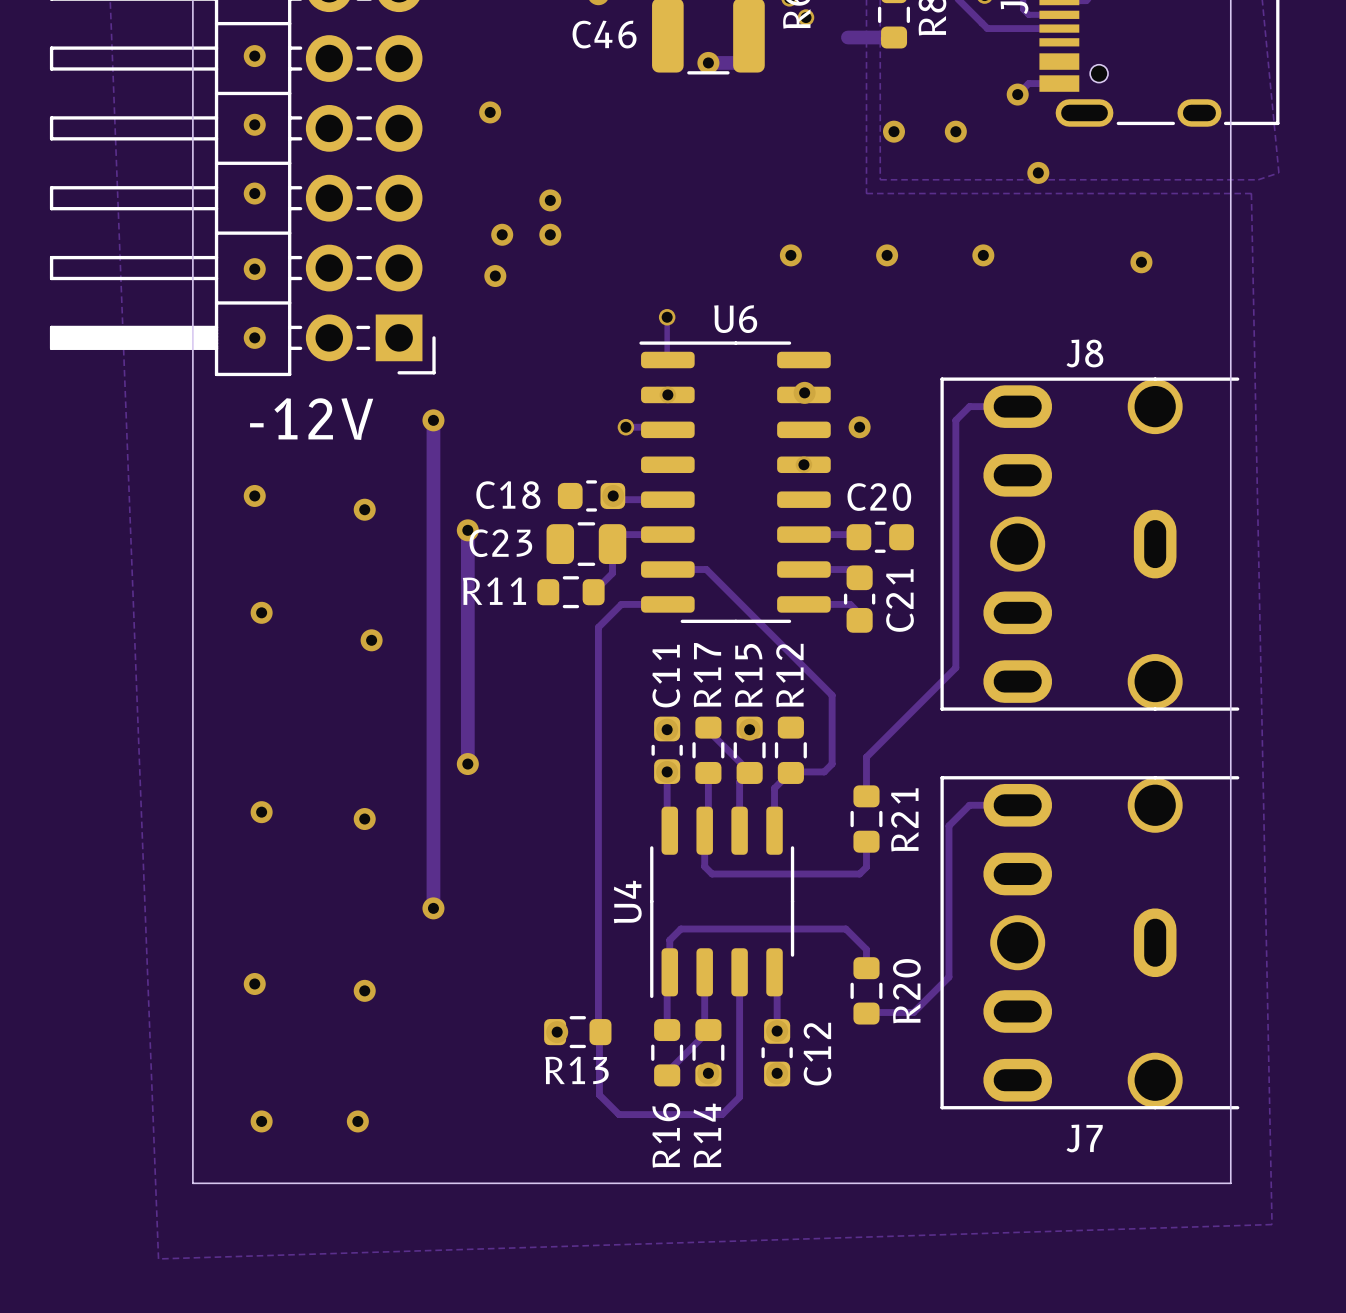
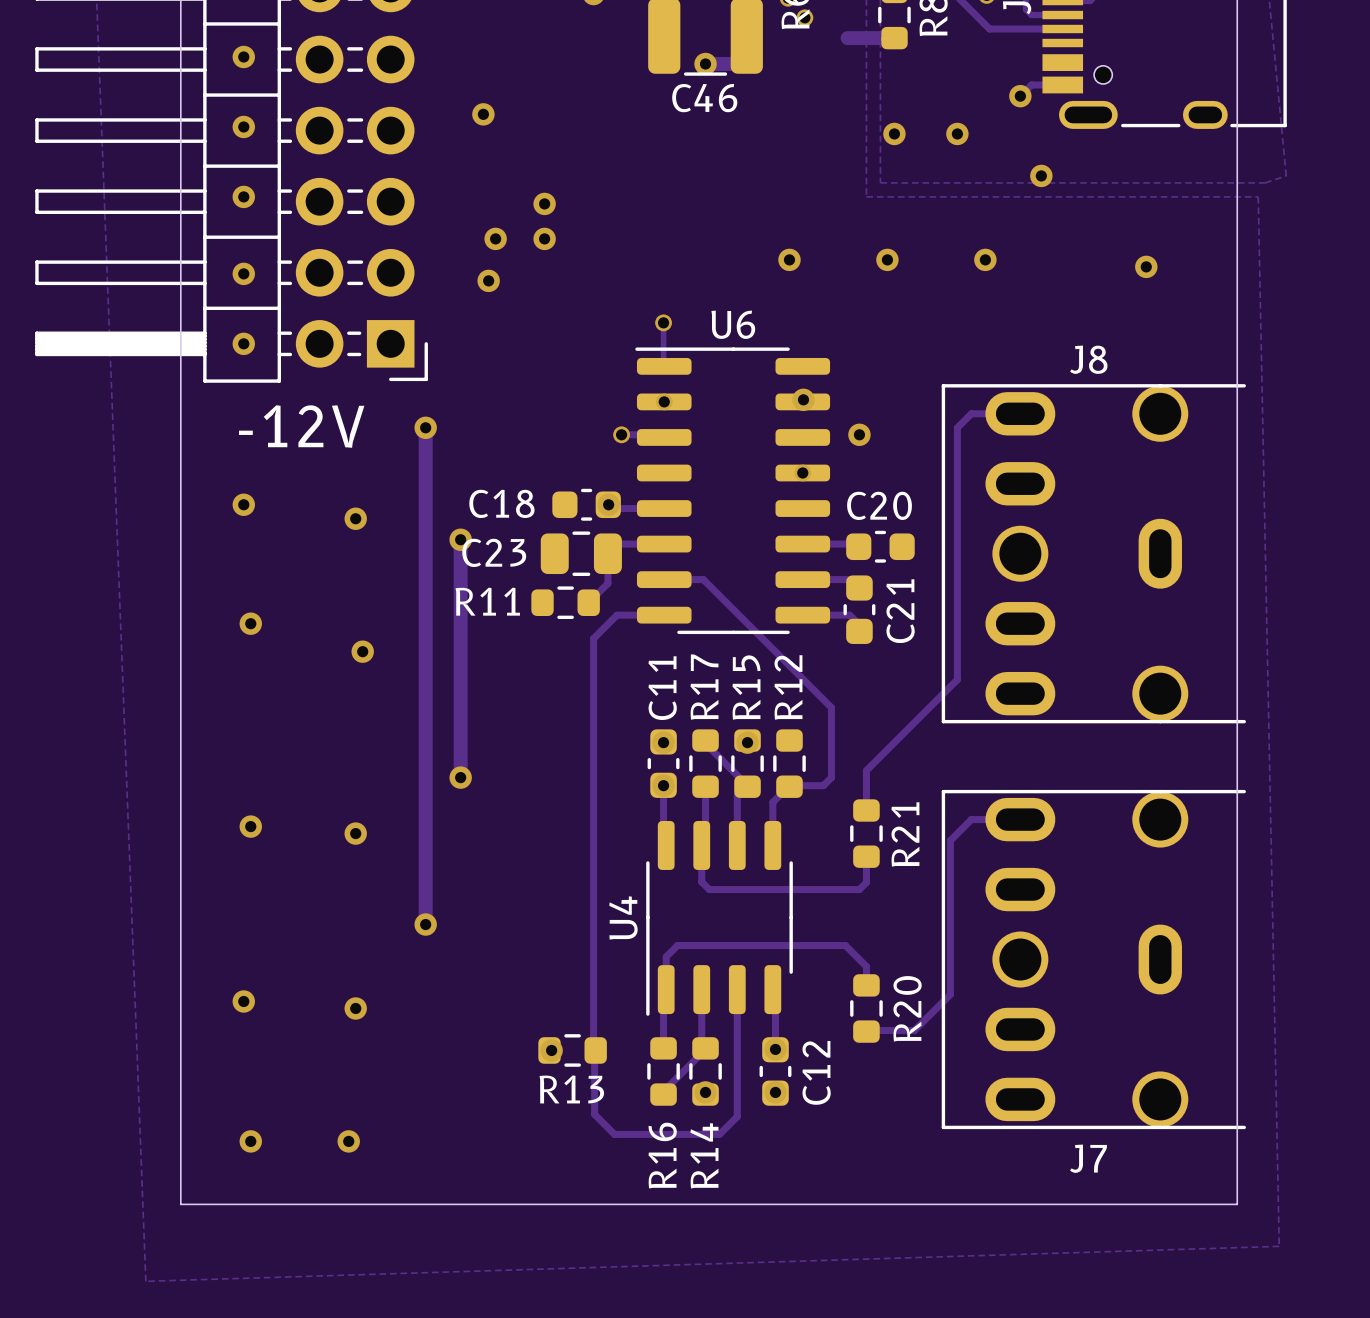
C46 name position: C46 (604, 34) -> C46 (704, 98)

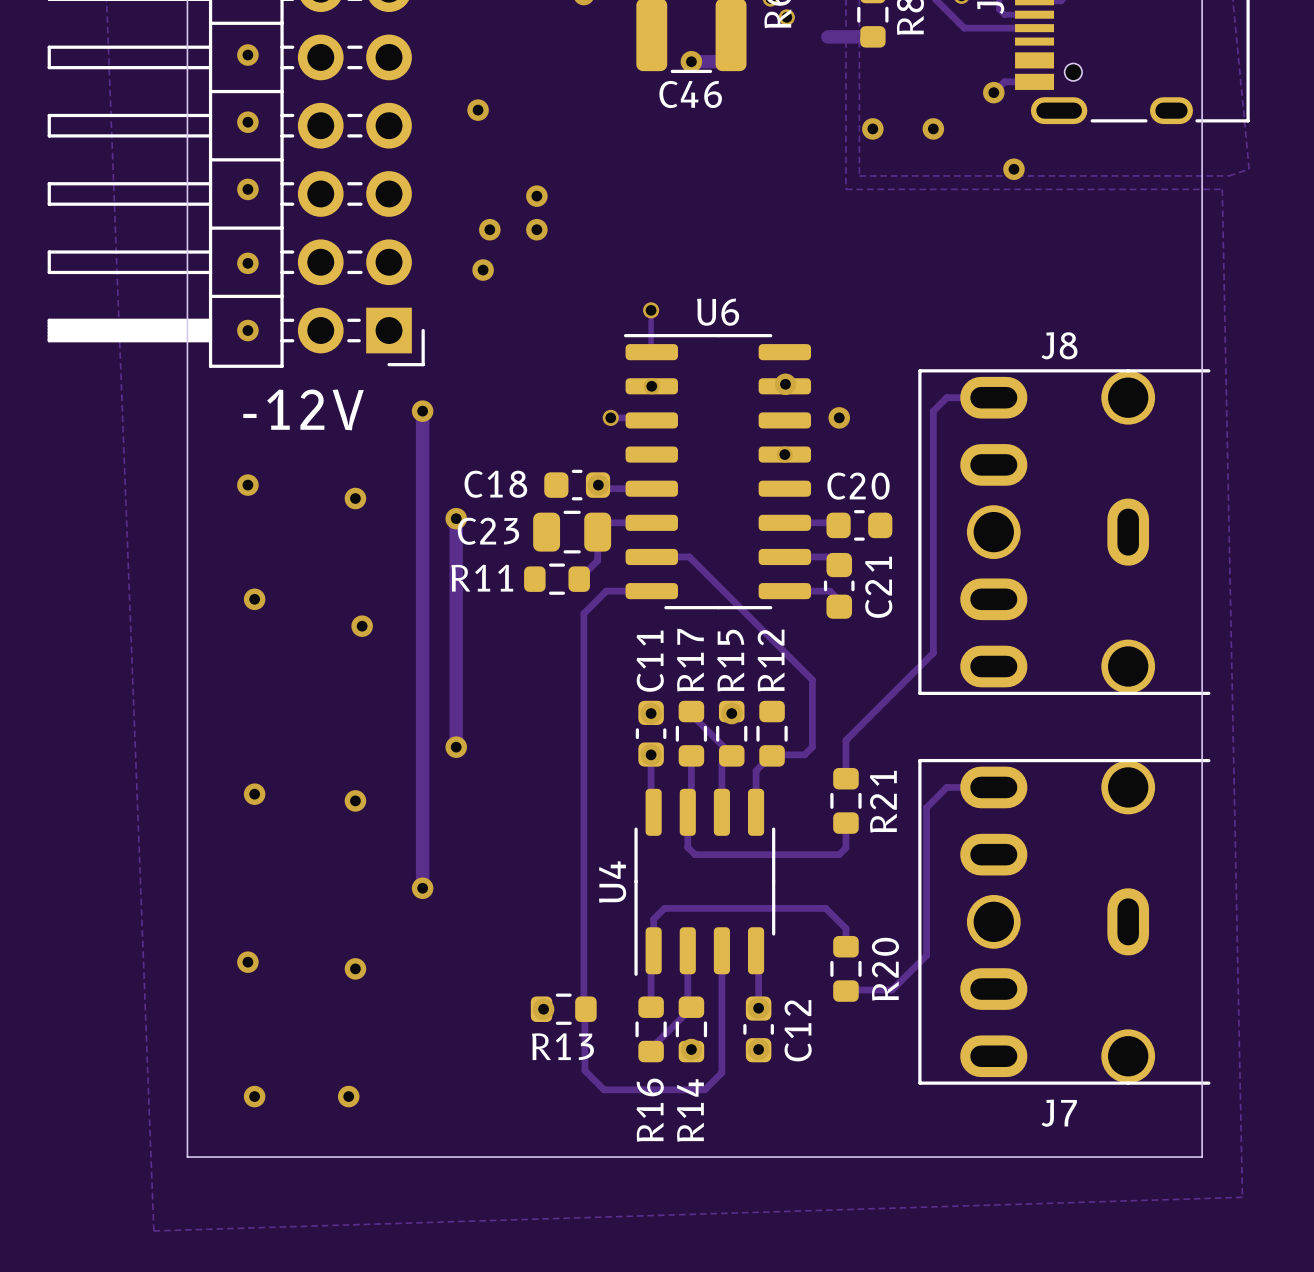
via: (789, 259) -> none
via: (887, 259) -> none
via: (985, 259) -> none
via: (1146, 266) -> none

